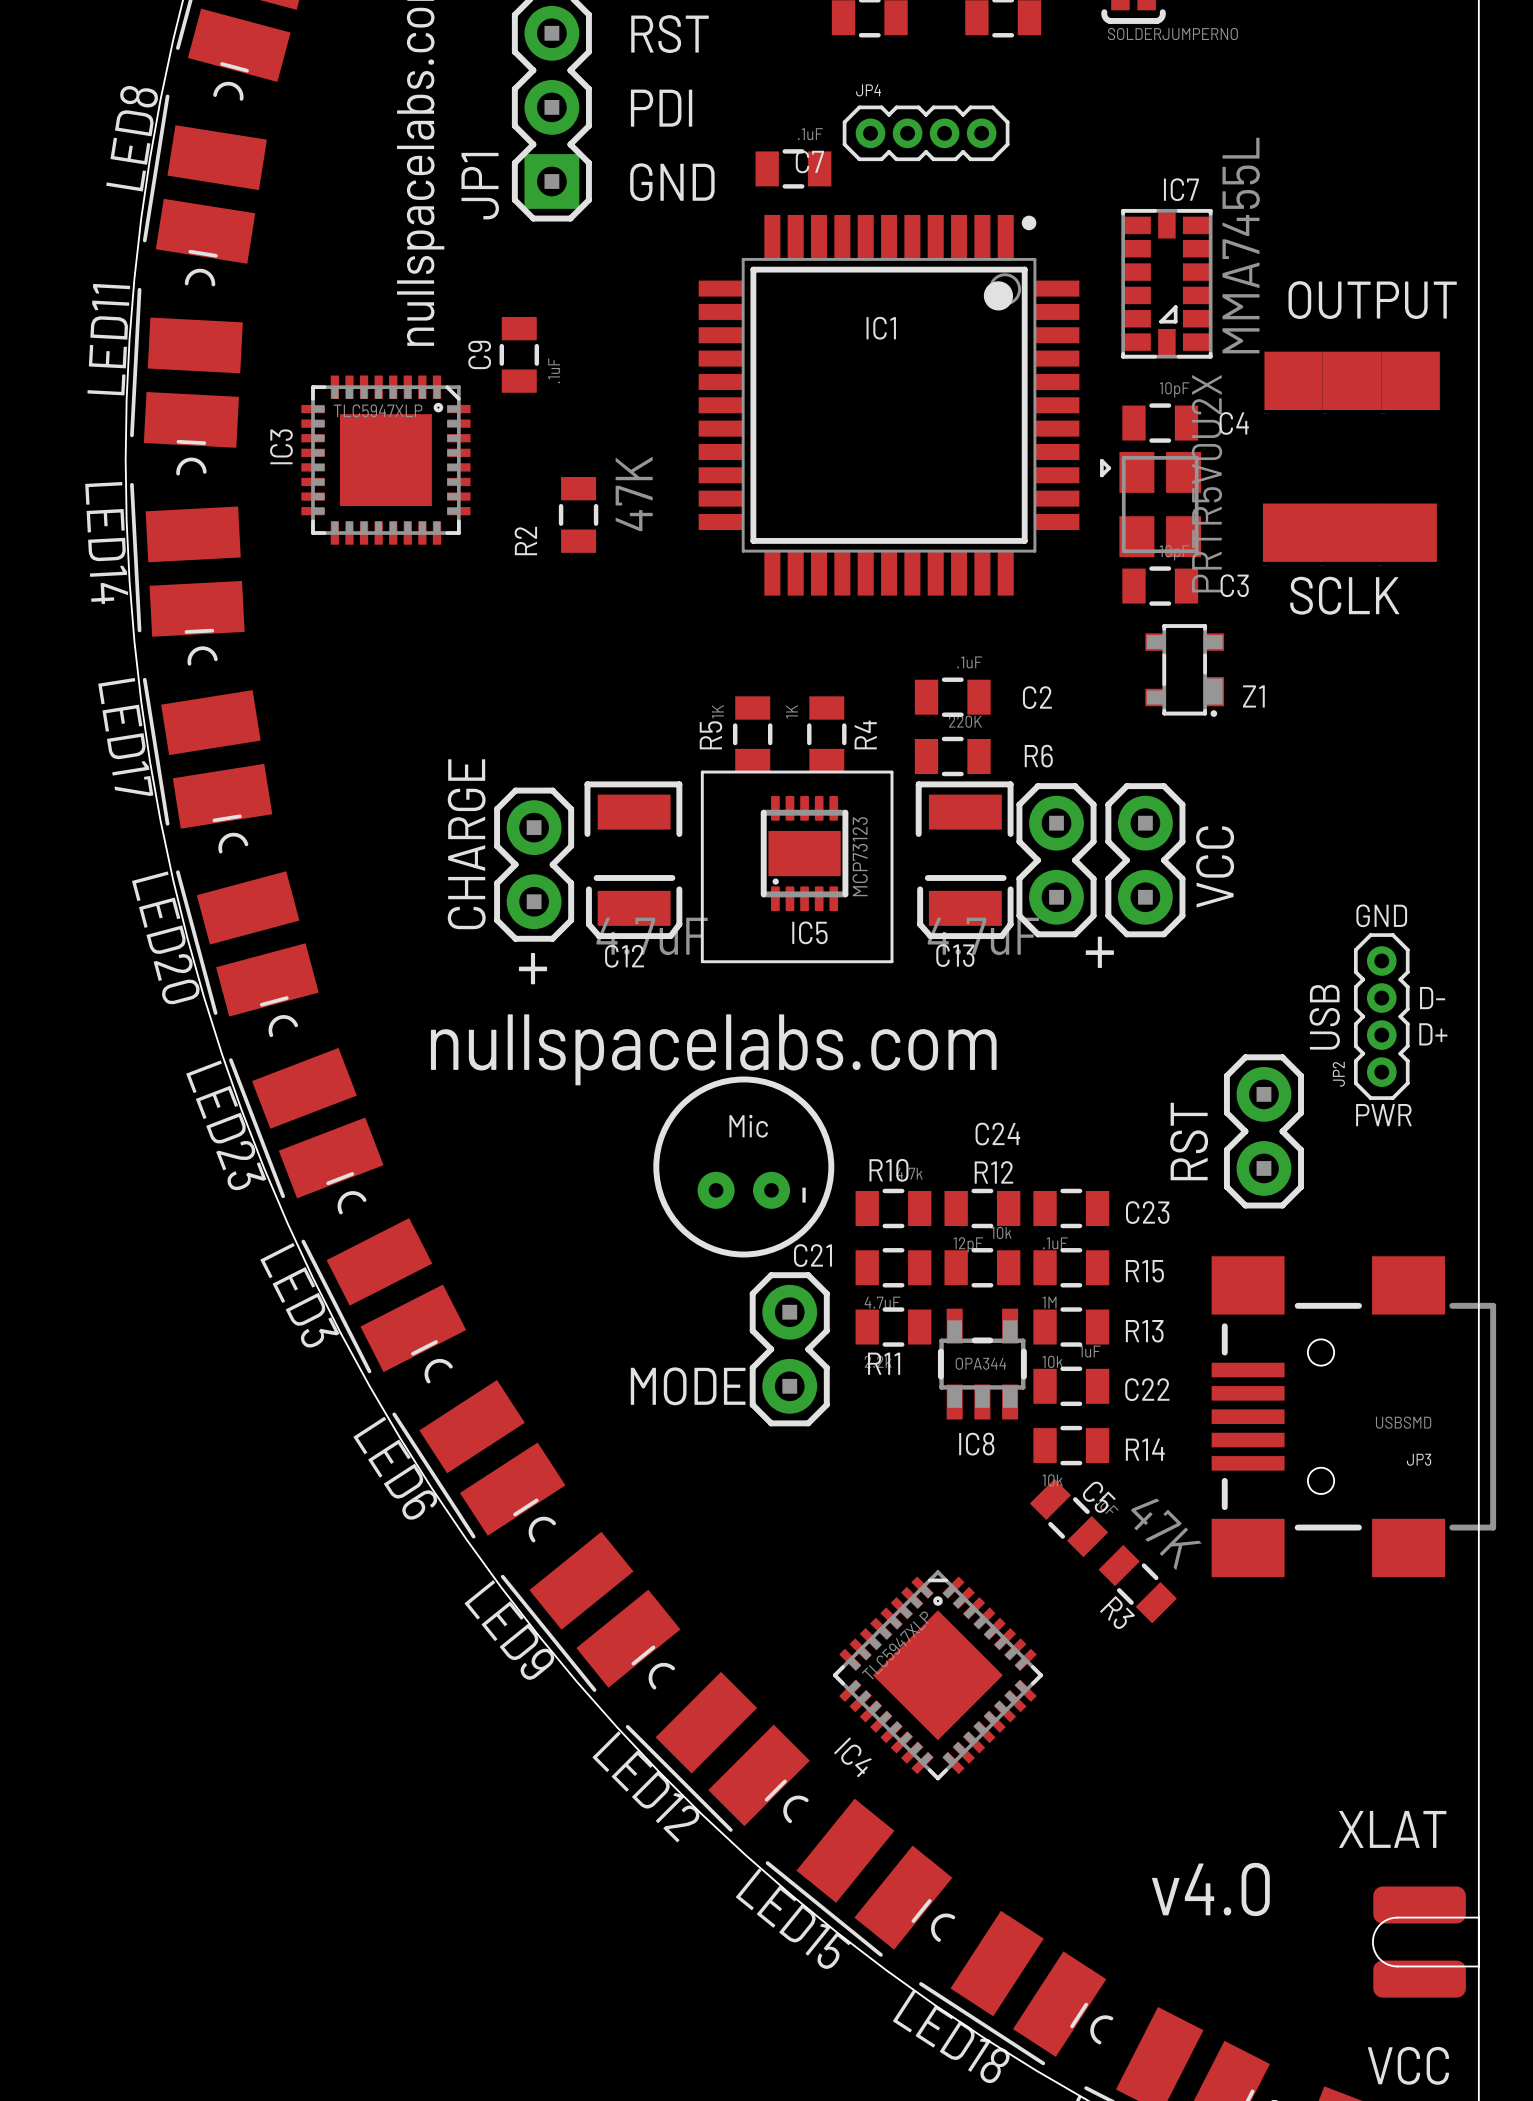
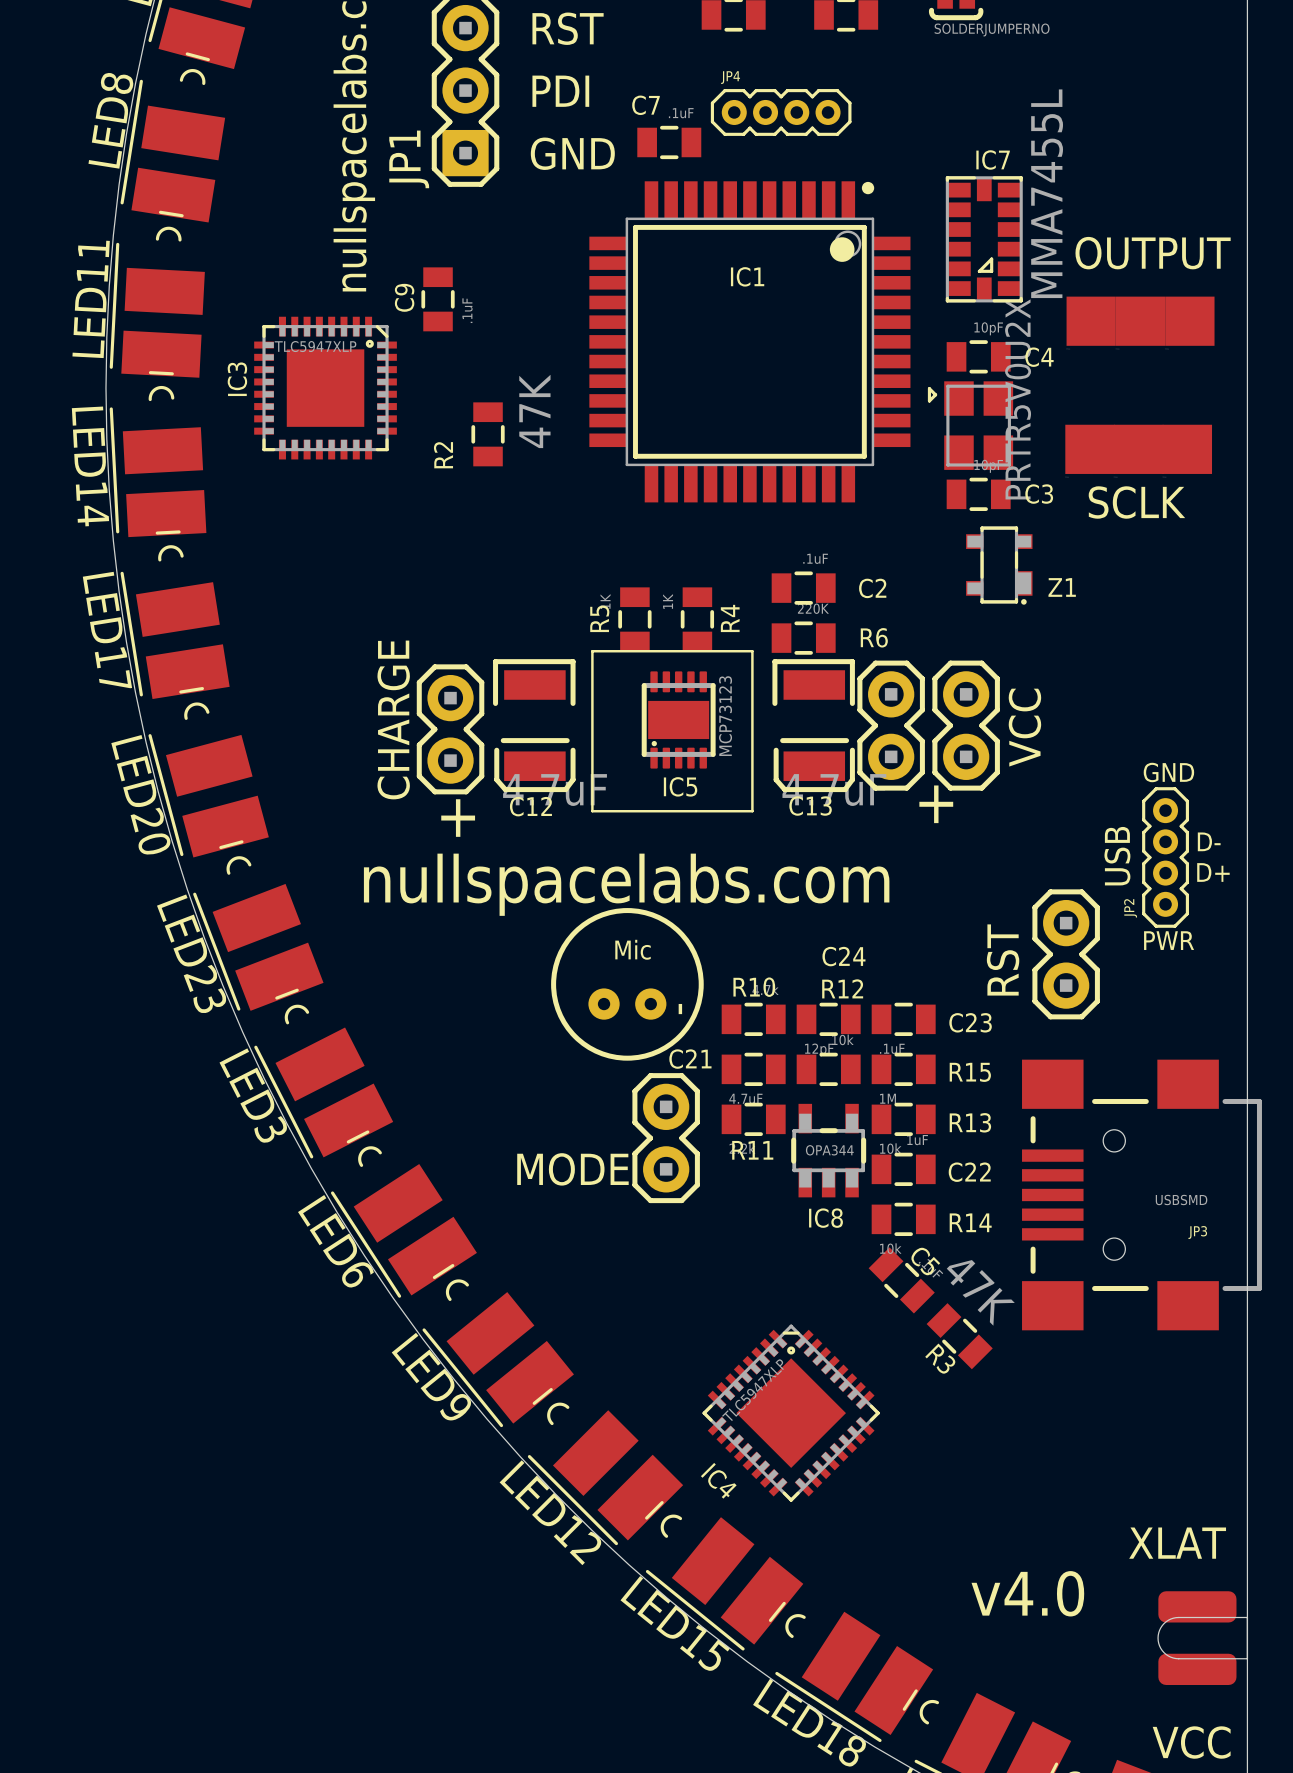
C7 name position: C7 (809, 161) -> C7 (646, 105)

